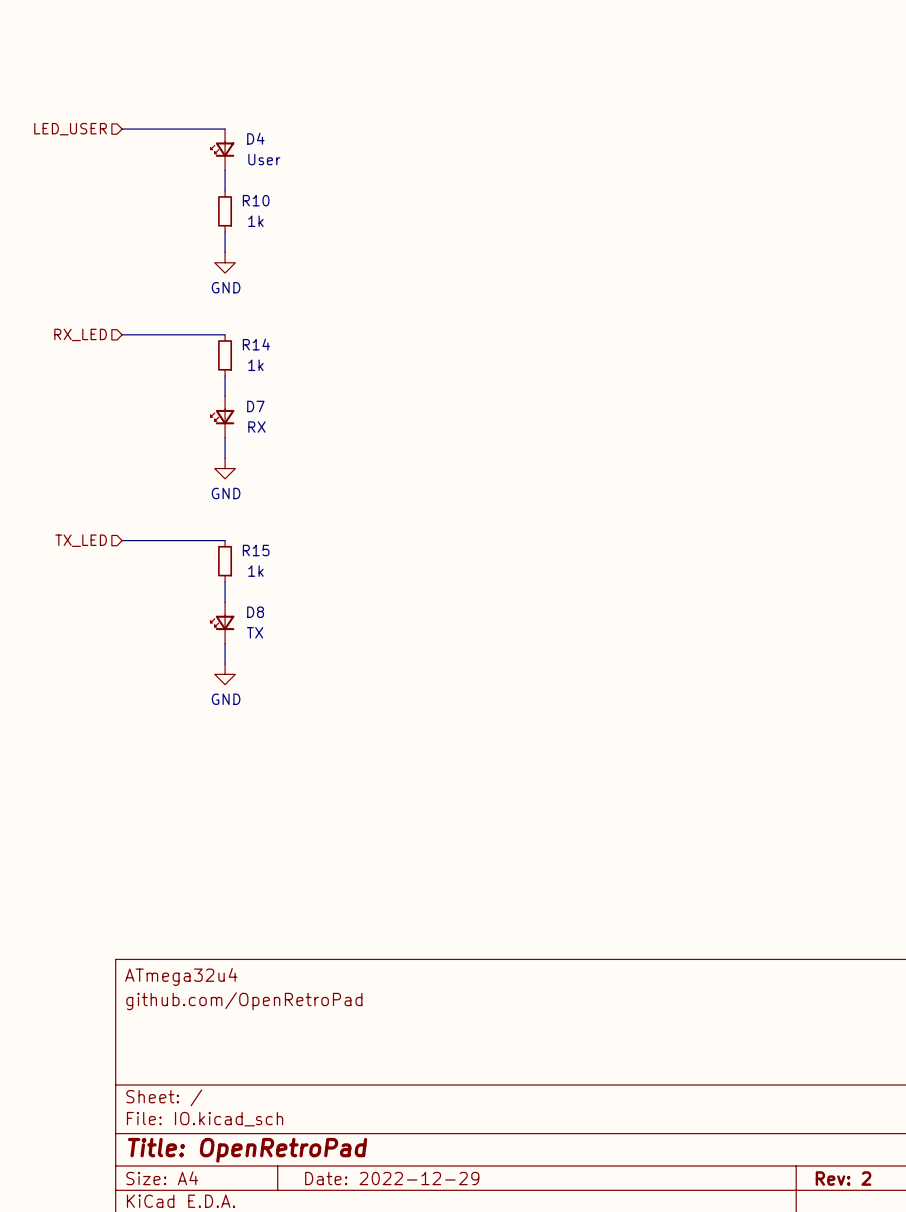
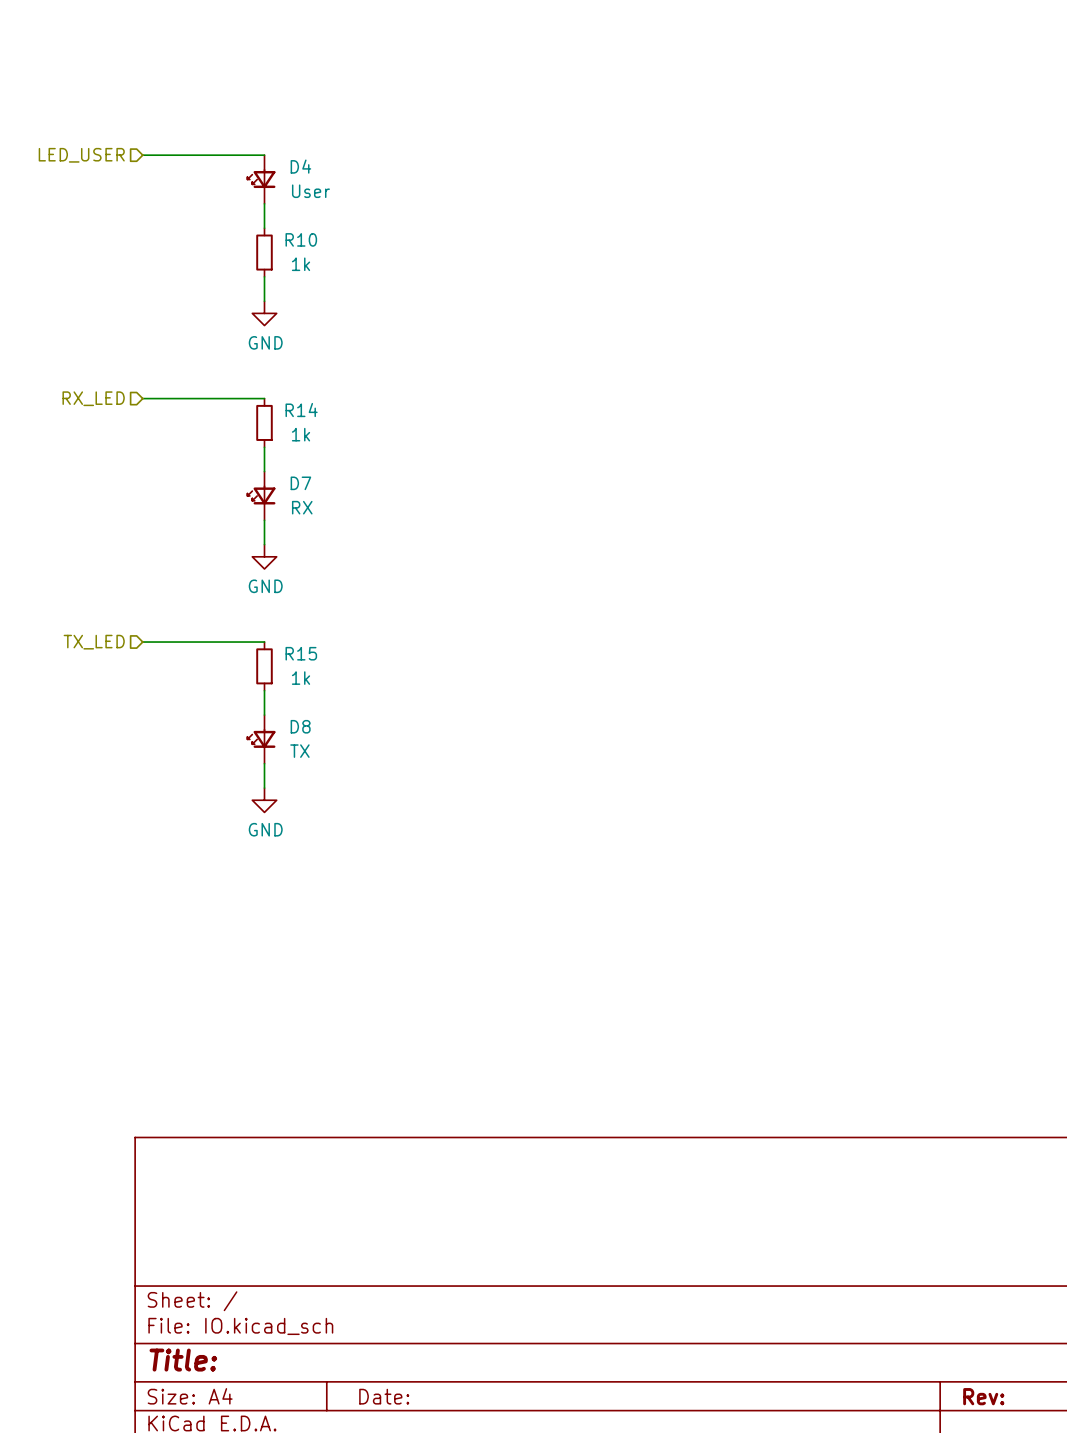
title block: ATmega32u4 (181, 976) -> none
title block: github.com/OpenRetroPad (244, 1001) -> none
title block: Title: OpenRetroPad (247, 1150) -> Title: (183, 1360)
title block: Date: 2022-12-29 (392, 1178) -> Date: (384, 1396)
title block: Rev: 2 (843, 1178) -> Rev: (983, 1396)

